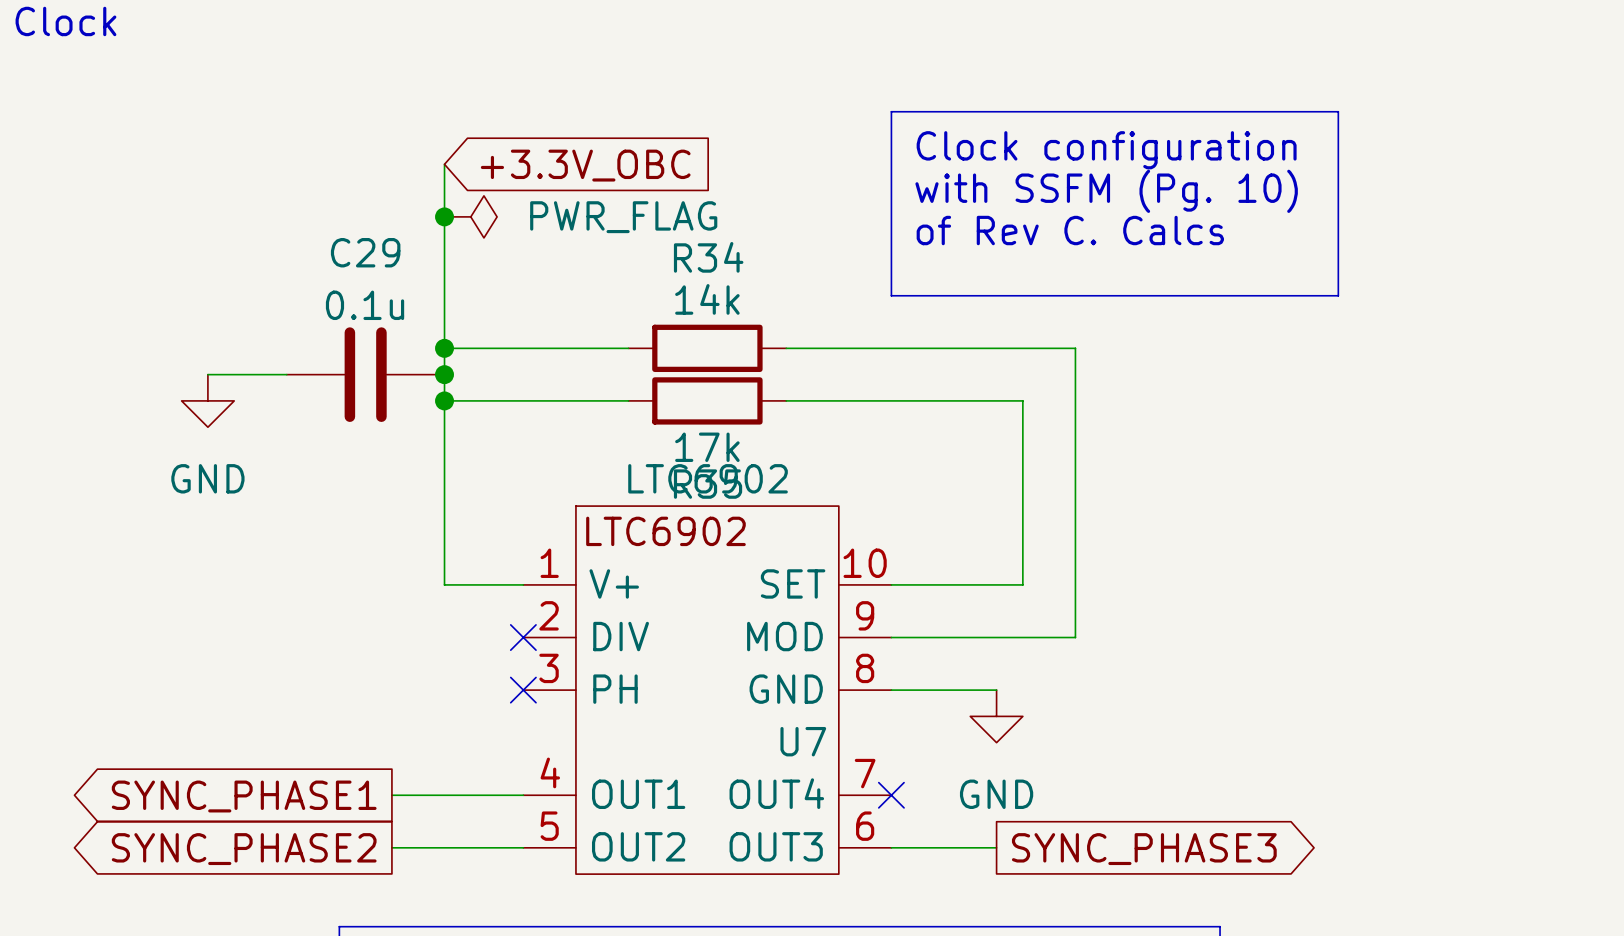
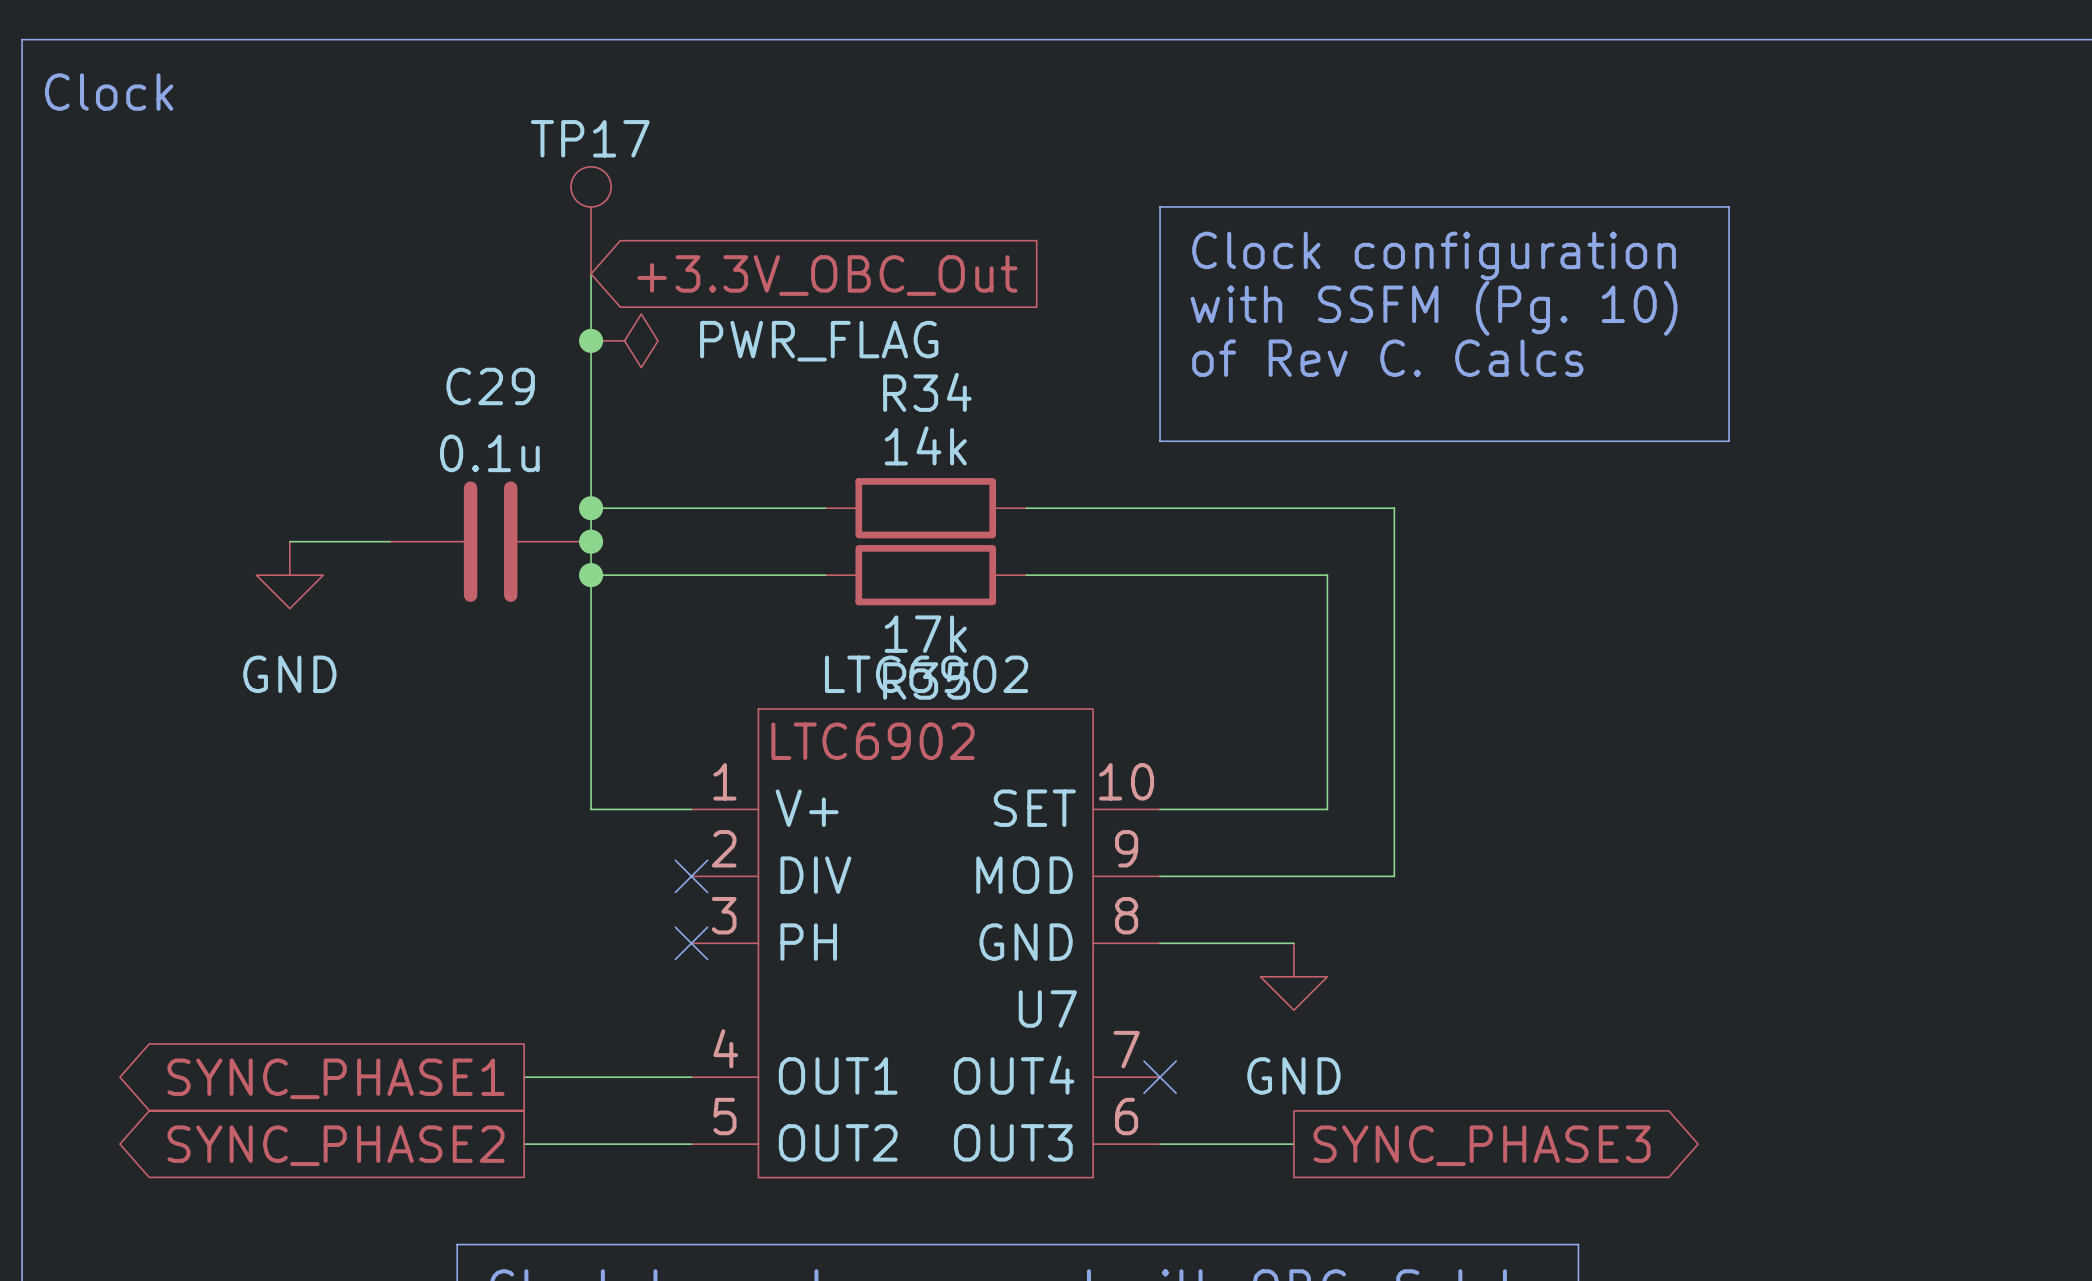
TP17: none -> (591, 220)
global label: +3.3V_OBC (585, 165) -> +3.3V_OBC_Out (827, 275)

